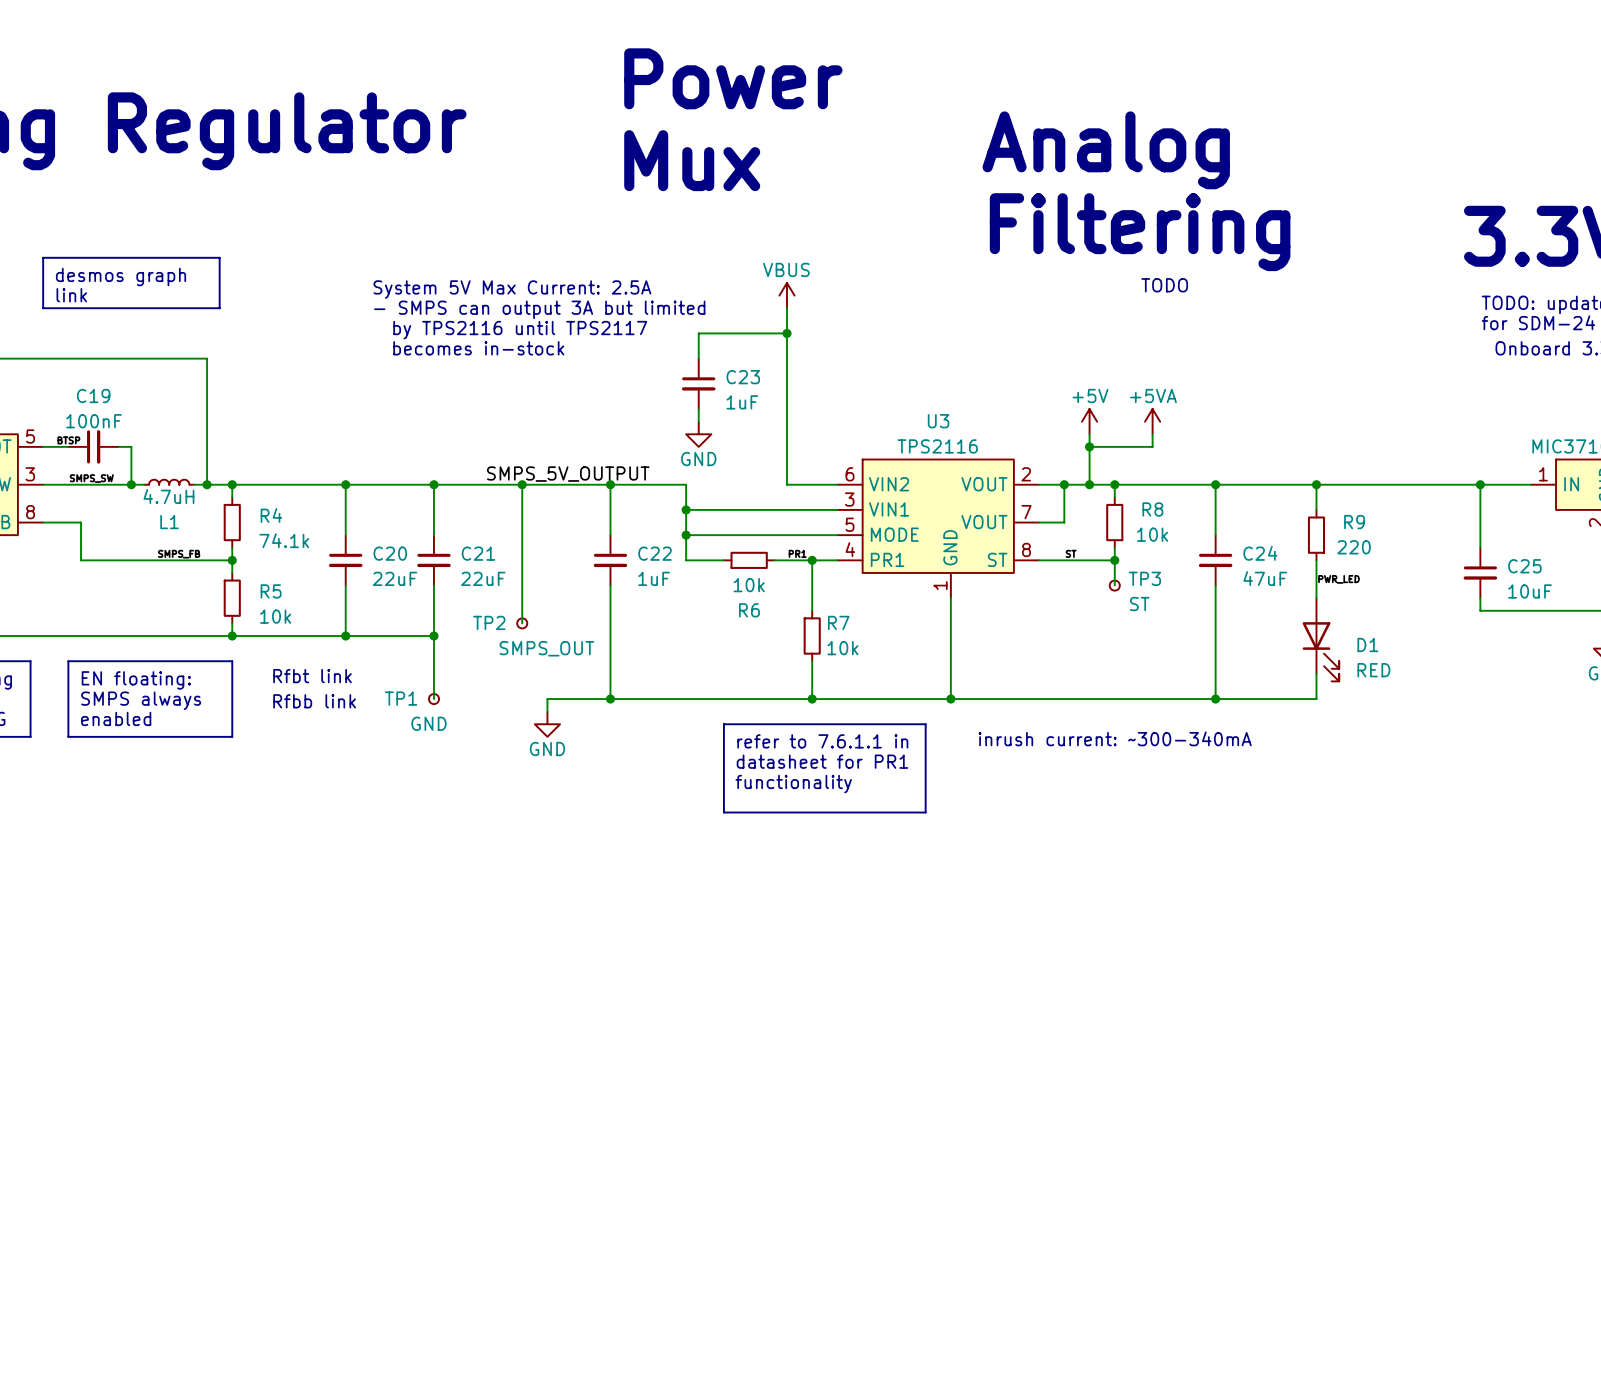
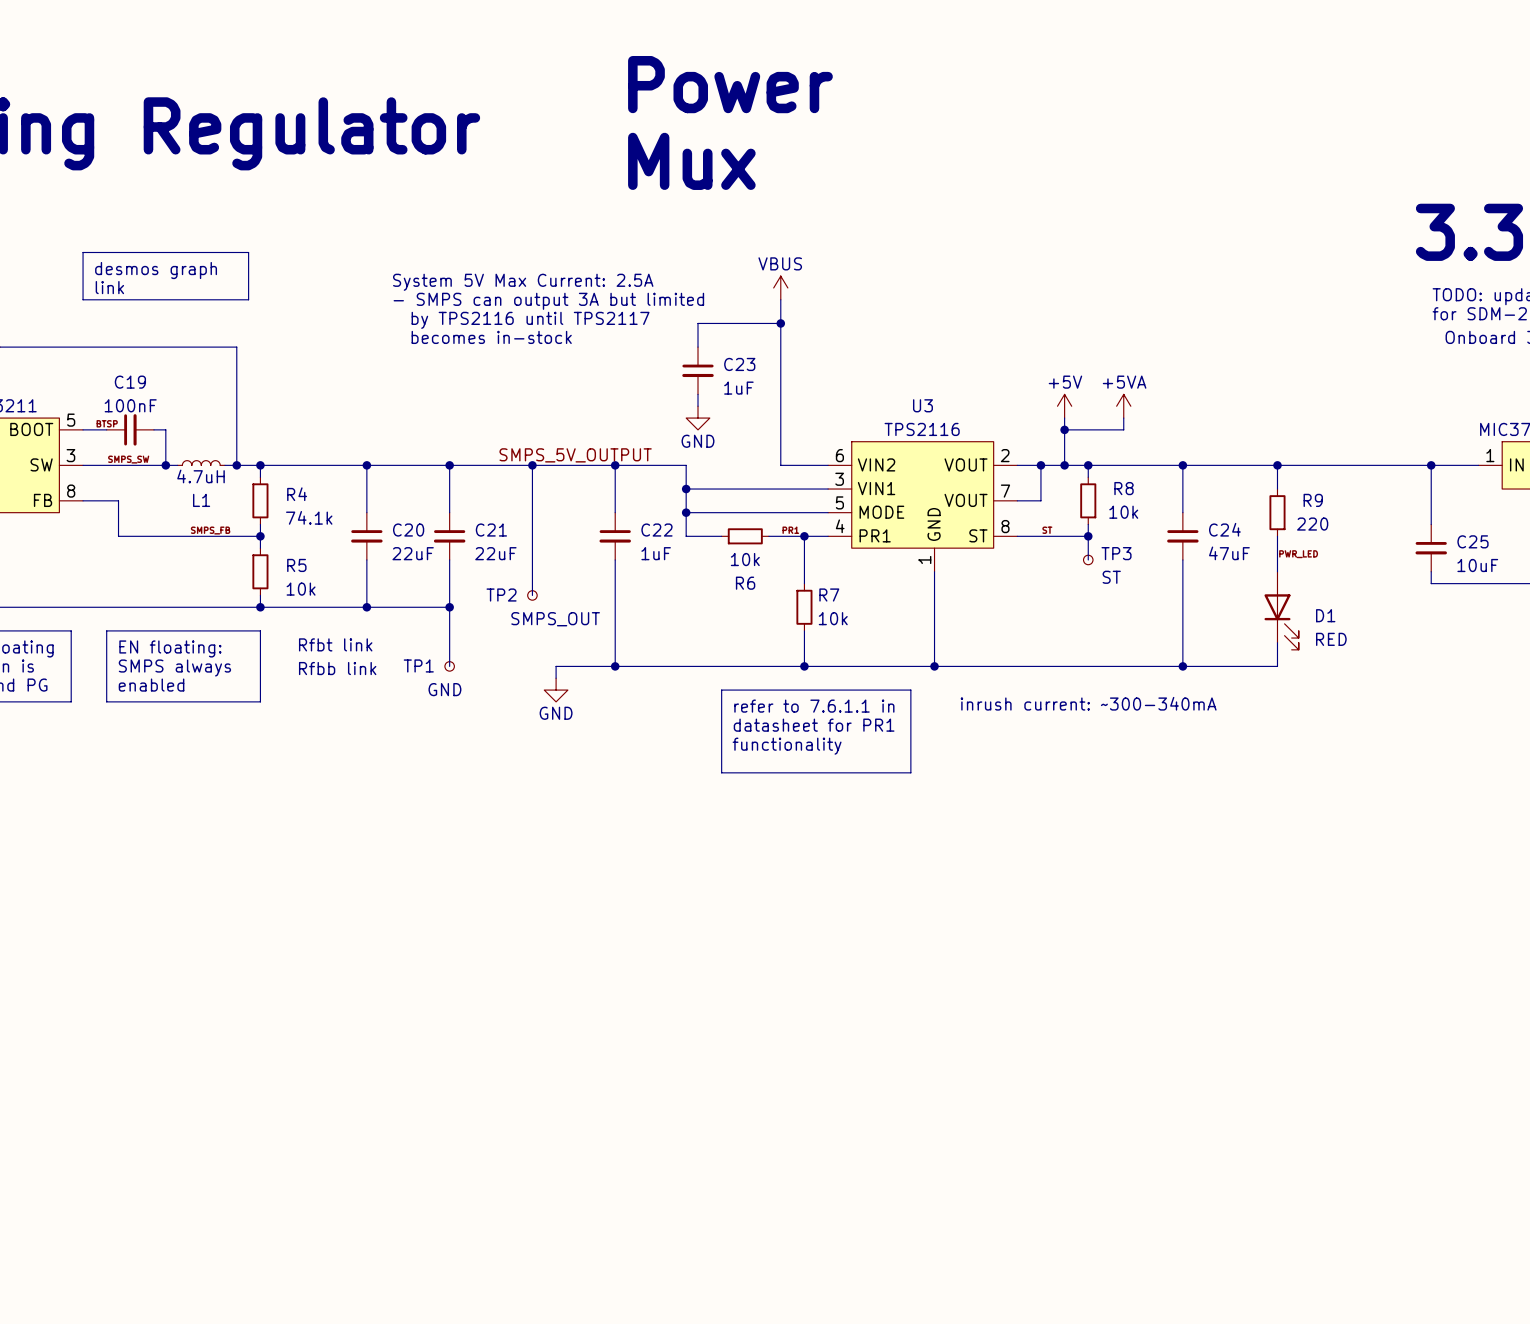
text: Analog (1106, 150) -> none
text: Filtering (1140, 232) -> none
text: TODO (1164, 285) -> none

